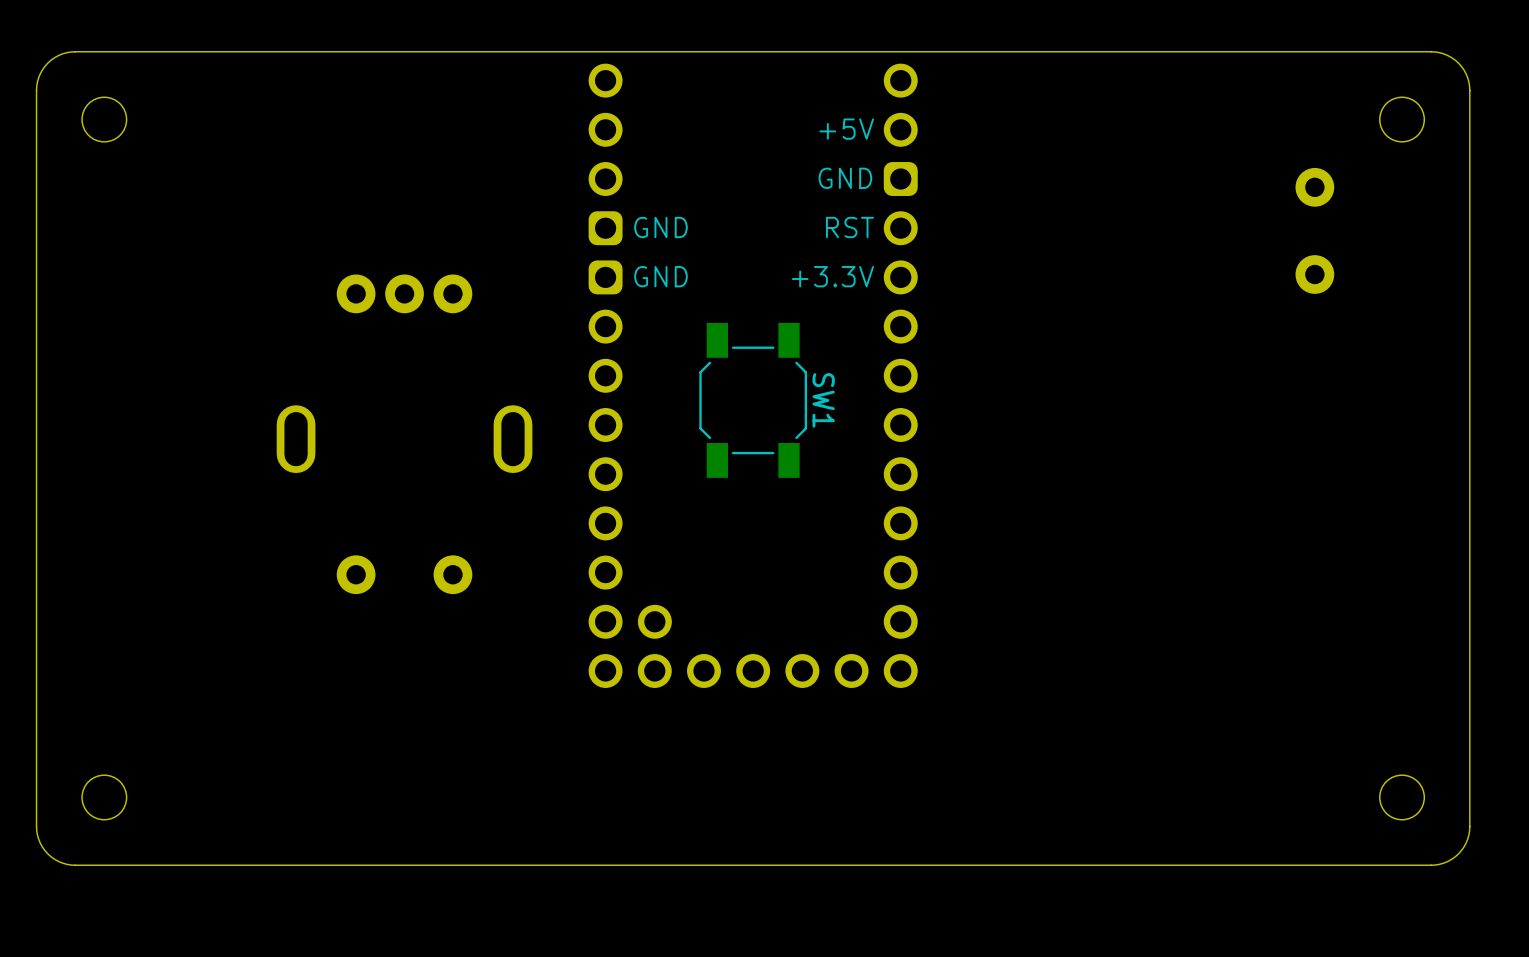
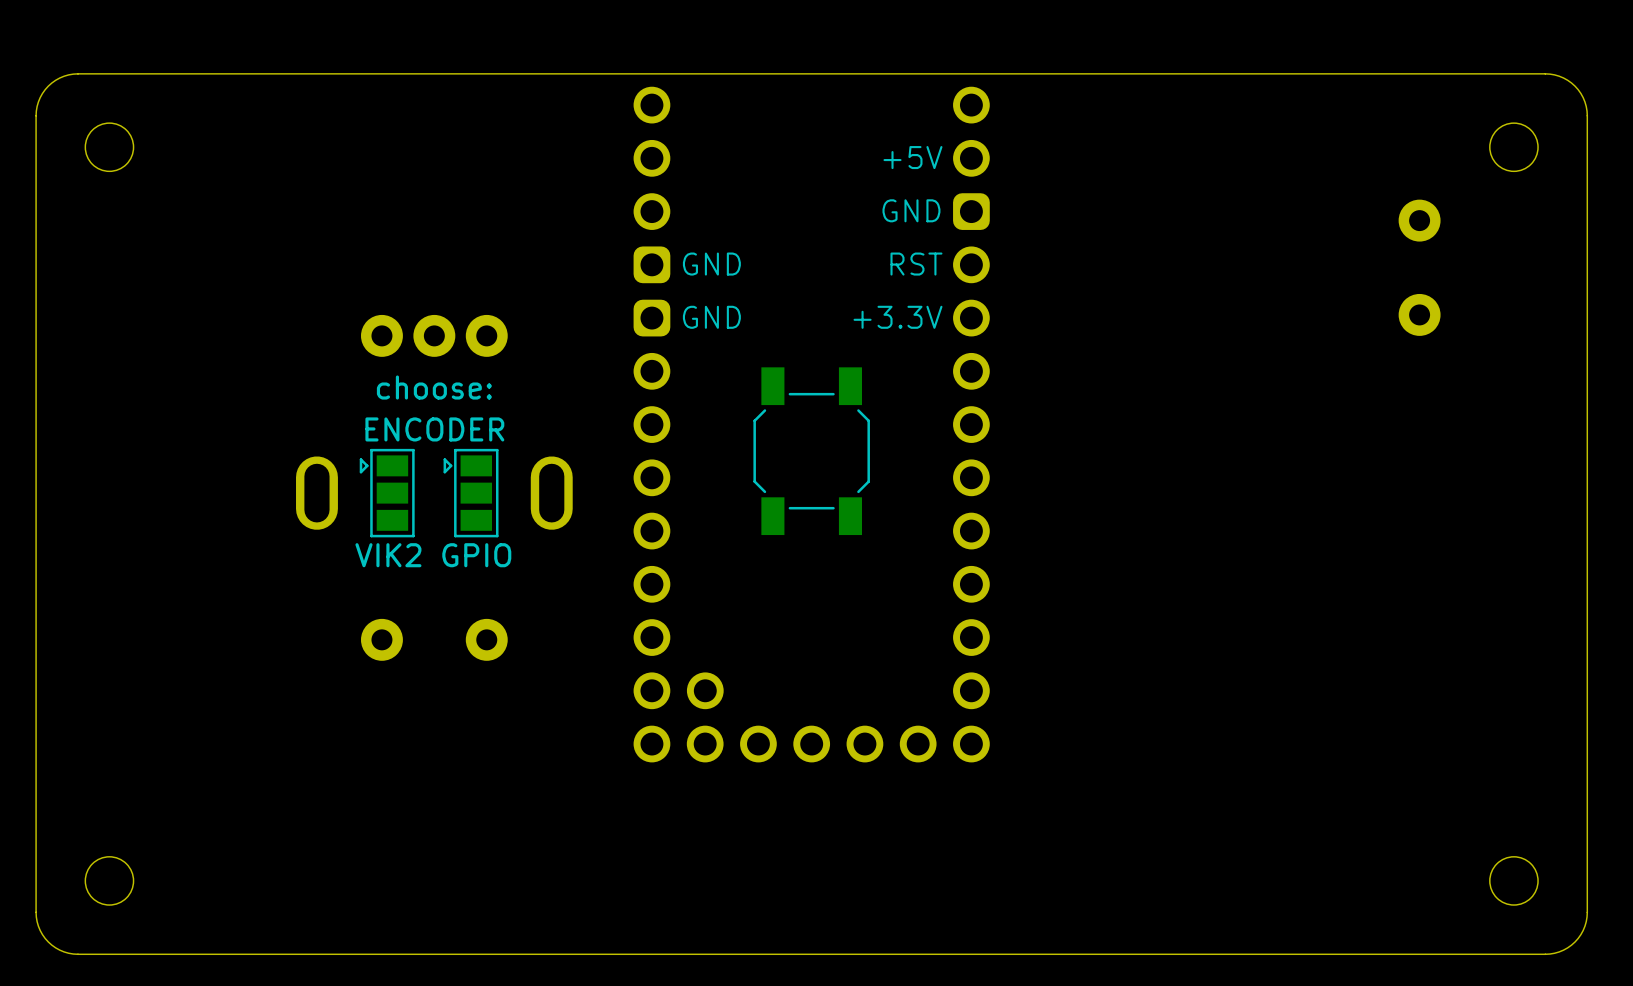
text: none -> choose: (434, 387)
text: none -> ENCODER (434, 429)
SW1 name: SW1 (823, 400) -> none
part: none -> (387, 493)
part: none -> (471, 493)
text: none -> VIK2 GPIO (433, 555)

